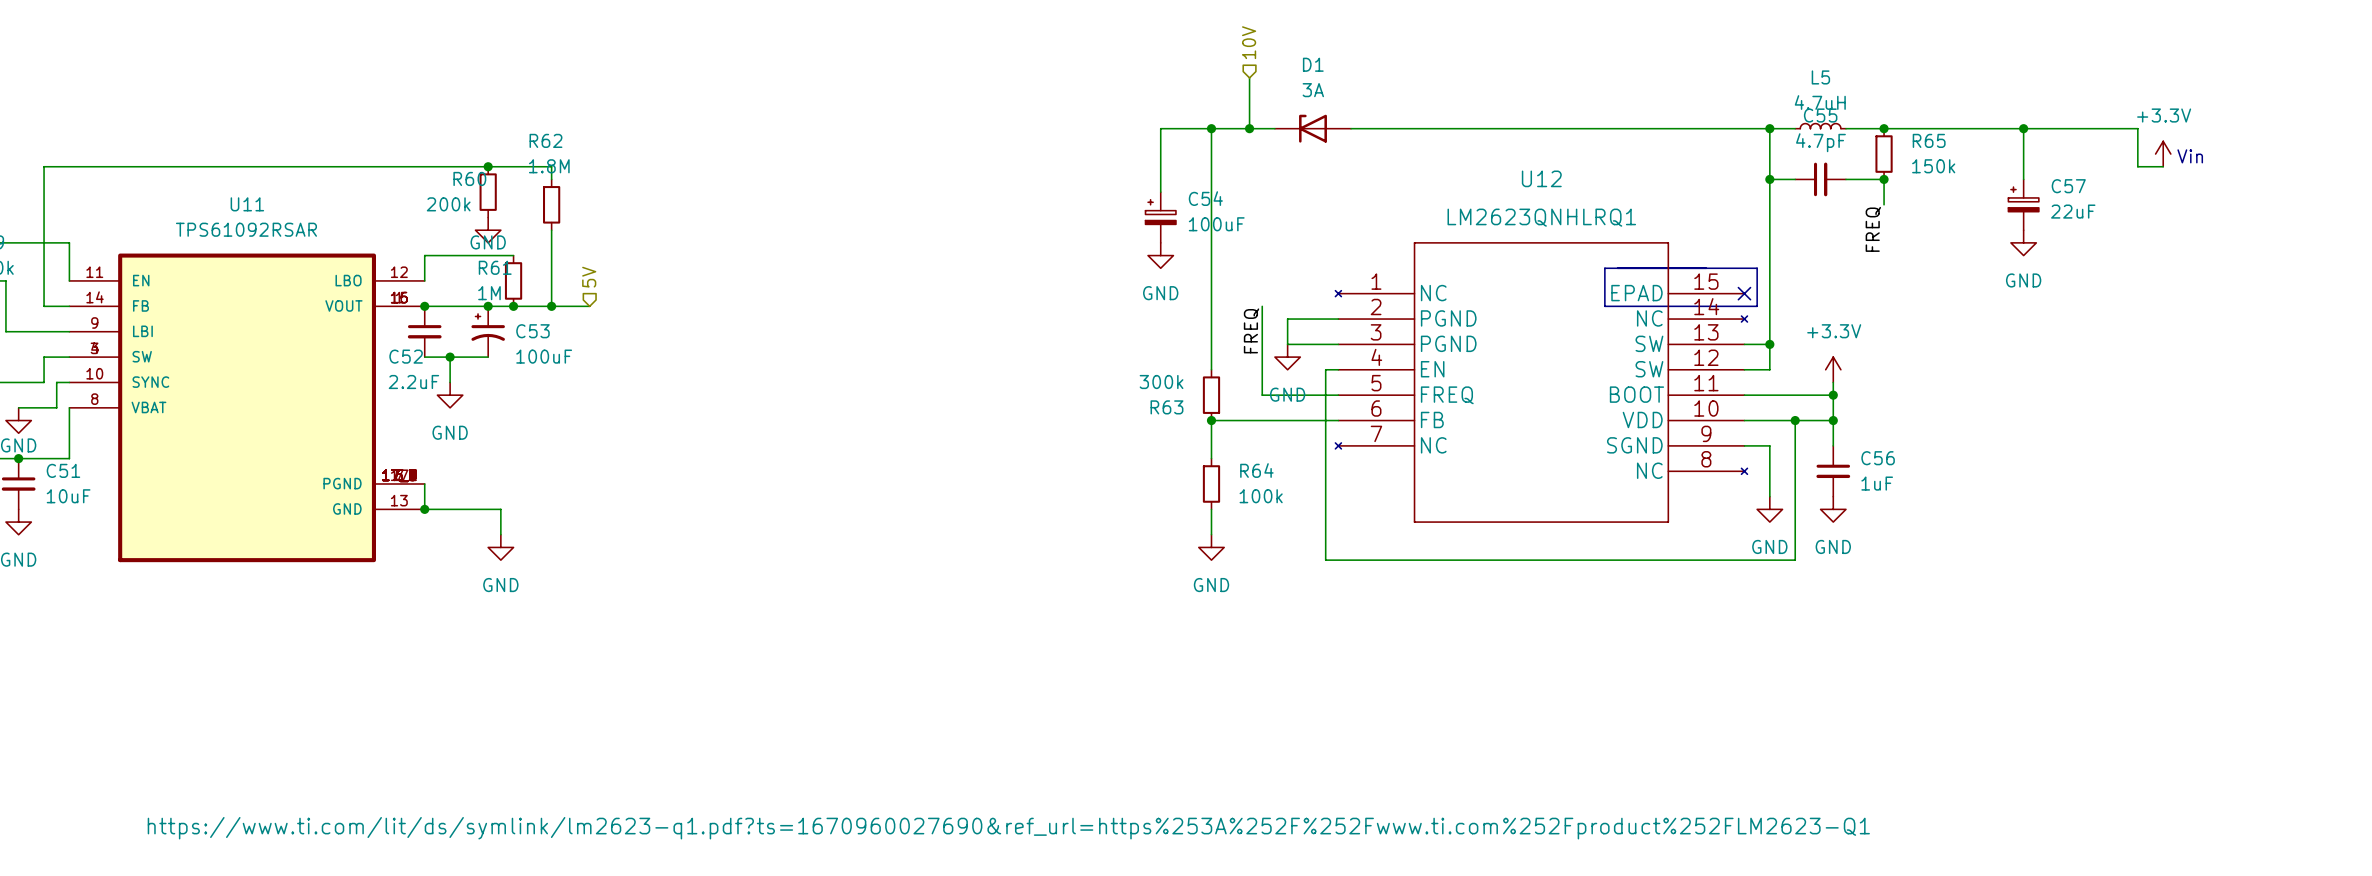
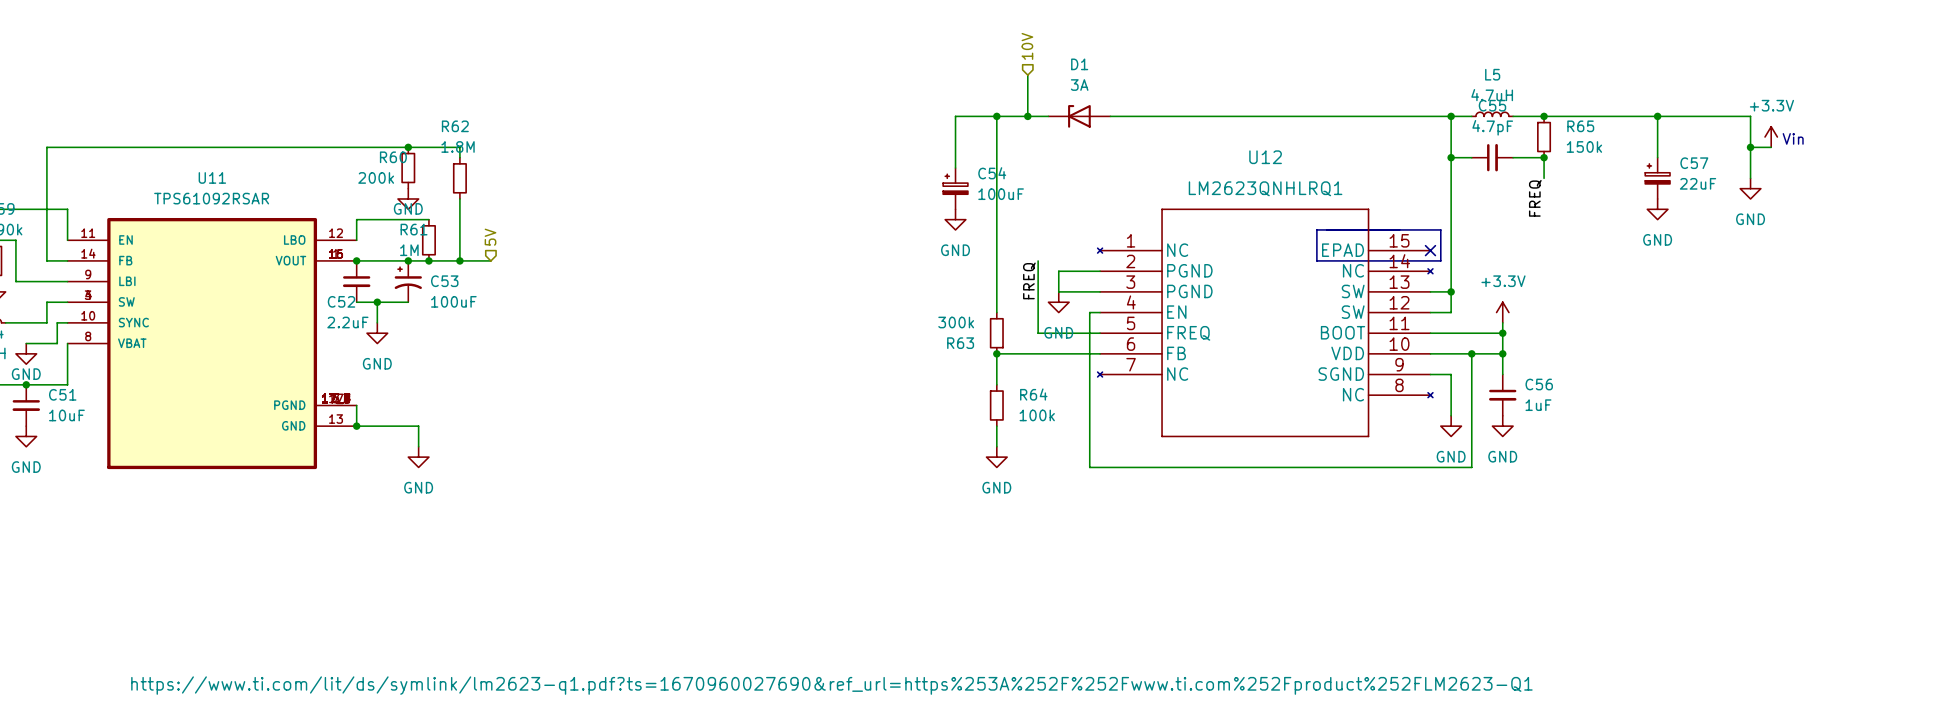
wire: none -> (1750, 147) (1750, 178)
junction: none -> (1750, 147)
power symbol: none -> GND (1750, 188)

